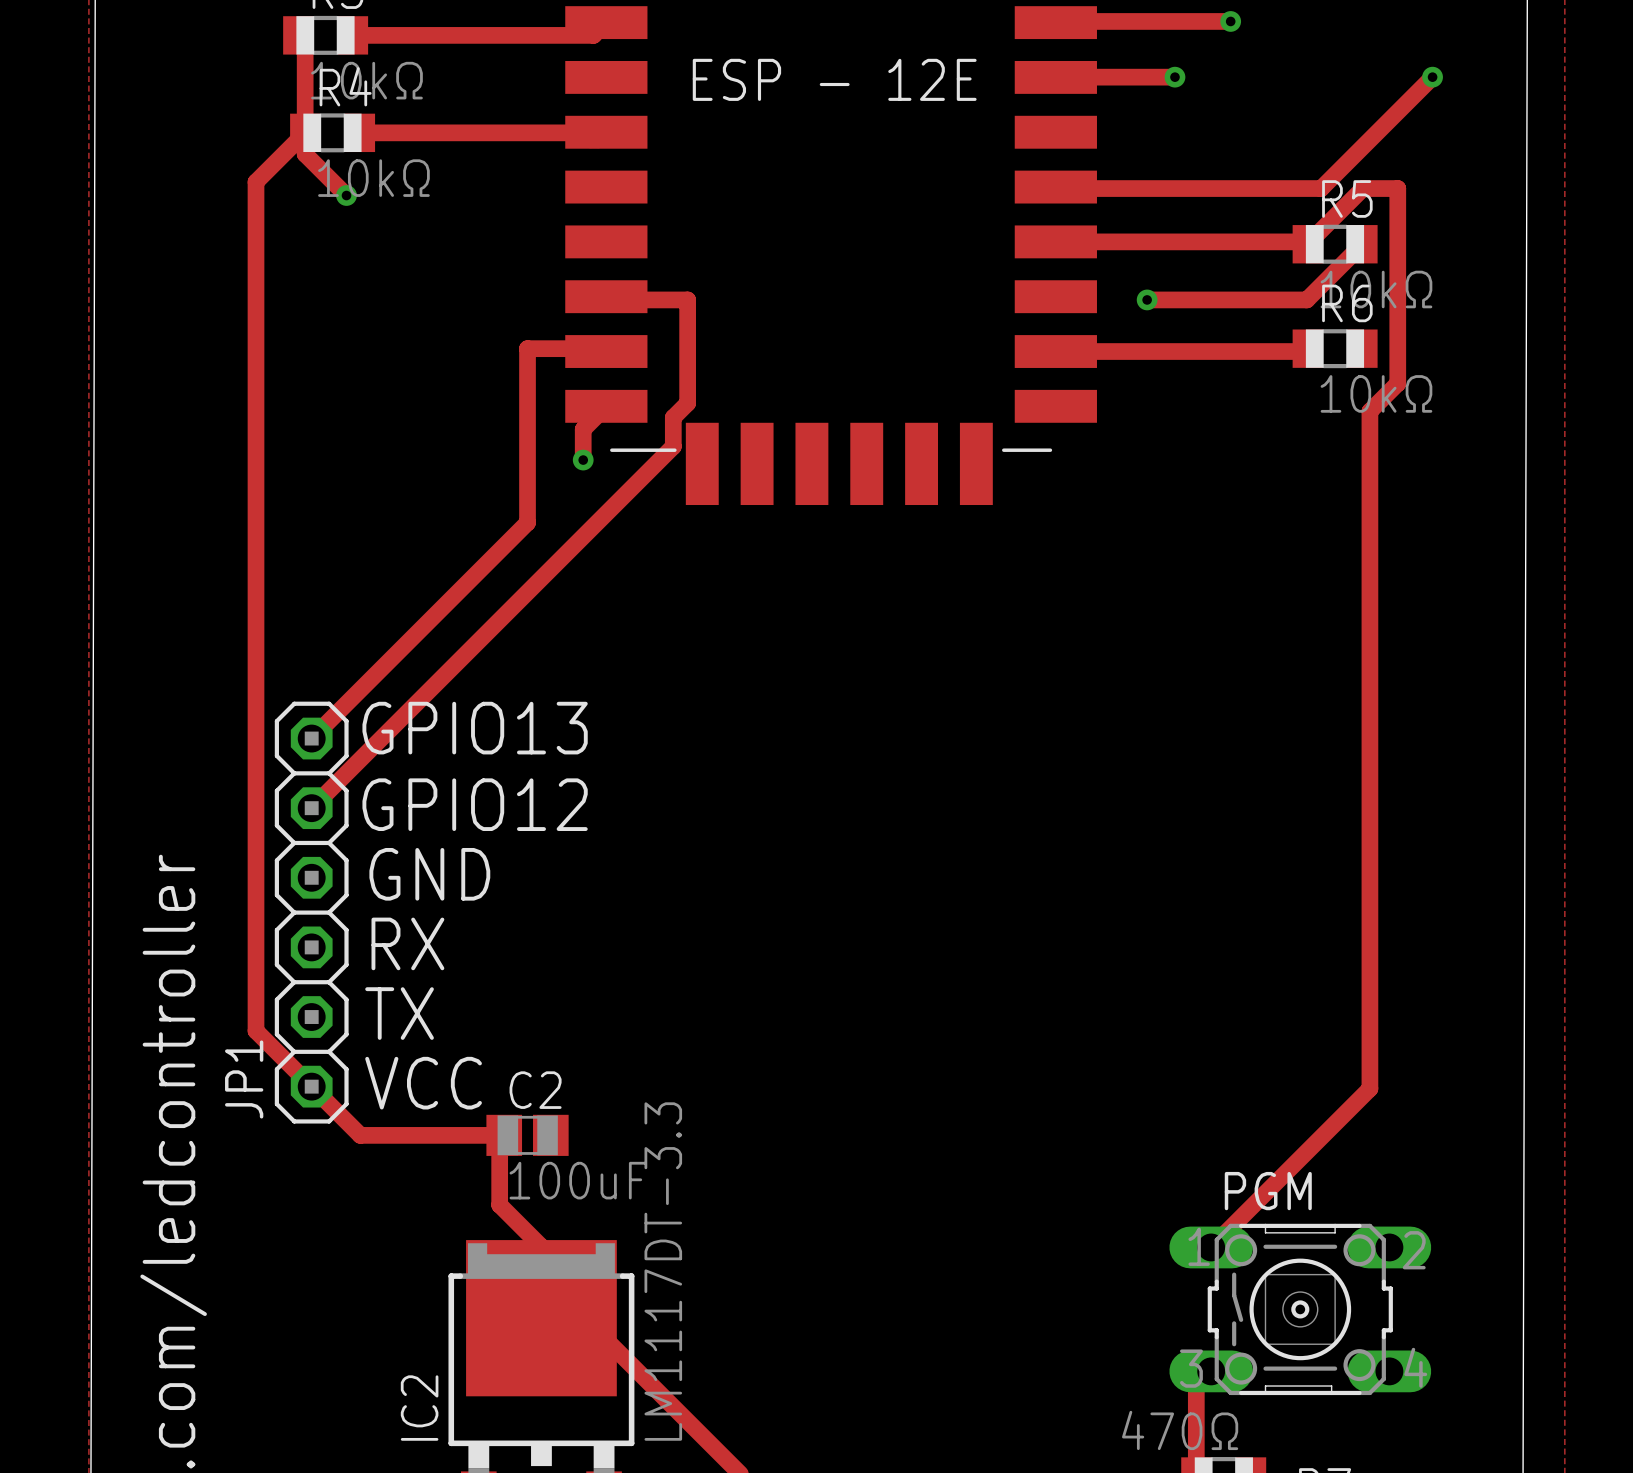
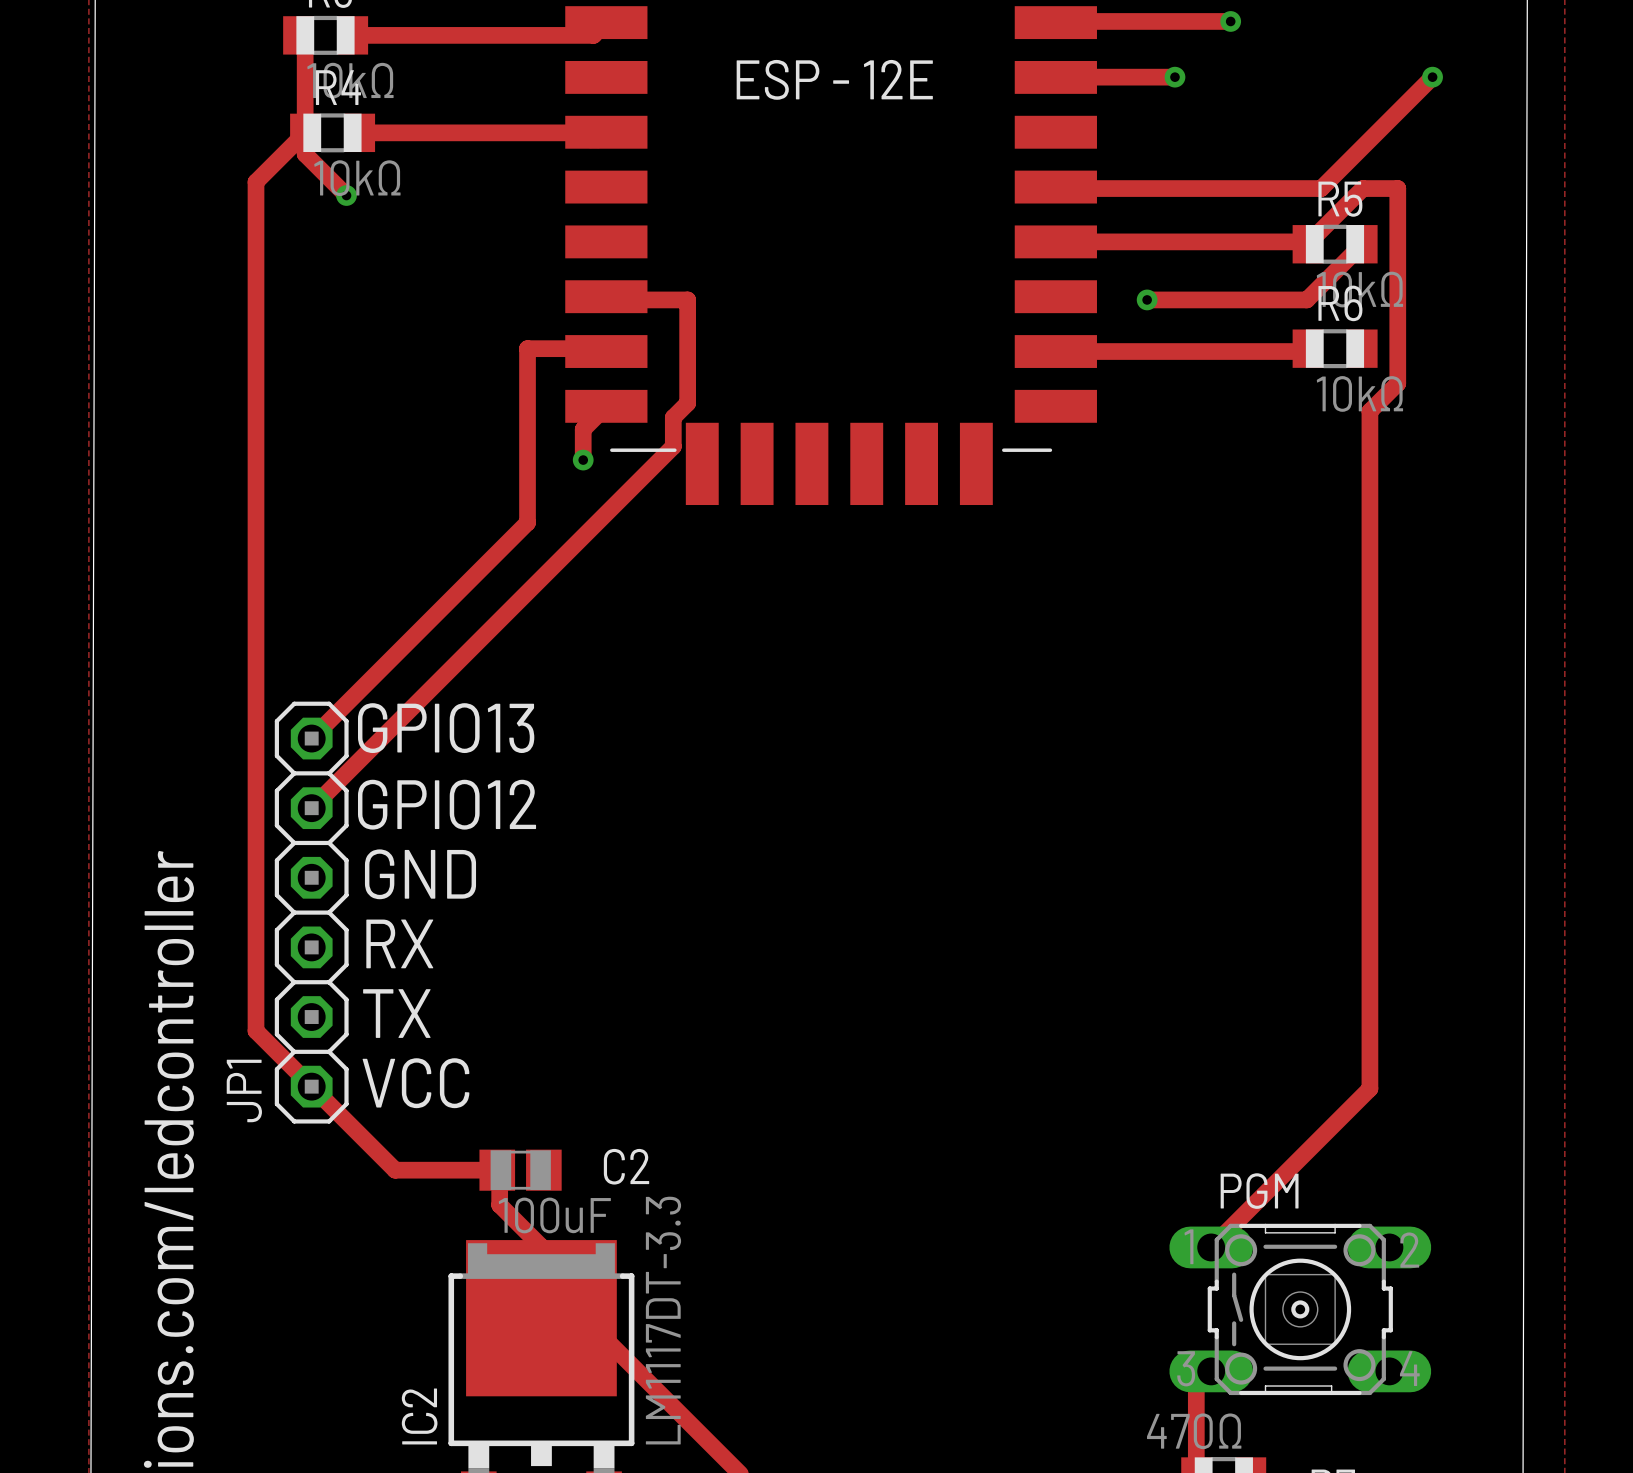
C2 name position: C2 (535, 1090) -> C2 (626, 1166)
track: (360, 1135) (504, 1135) (499, 1139) (499, 1172) -> (360, 1135) (395, 1170) (497, 1170) (499, 1172)
C2 position: (527, 1135) -> (520, 1170)

